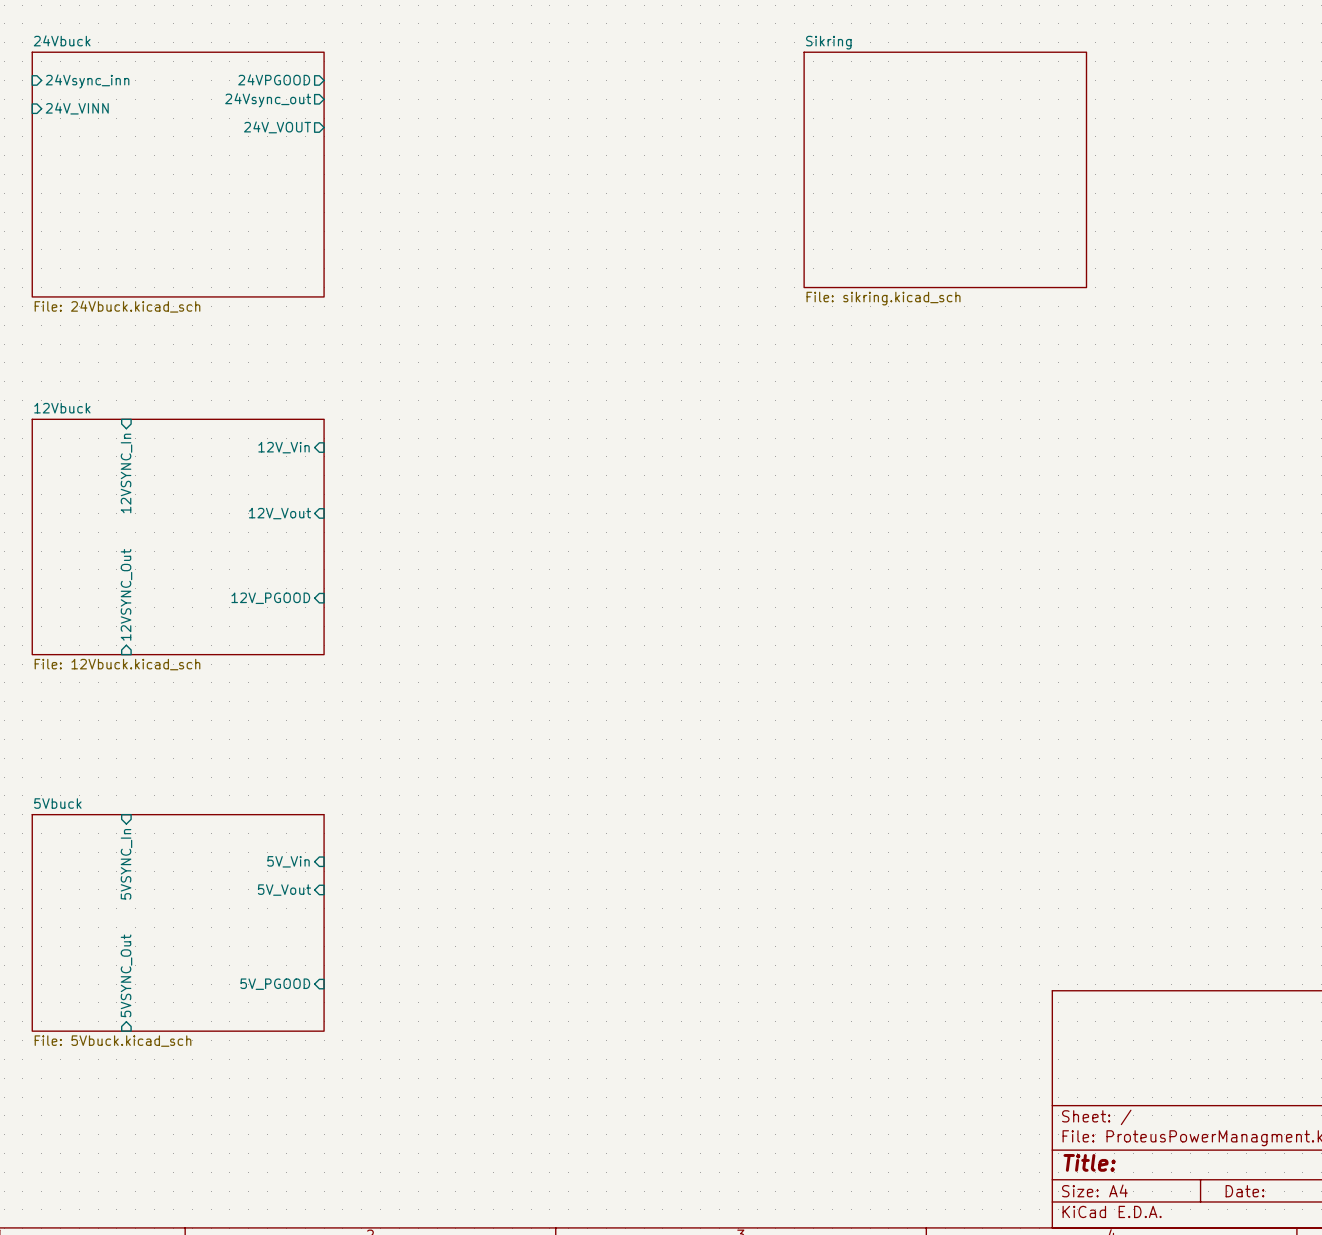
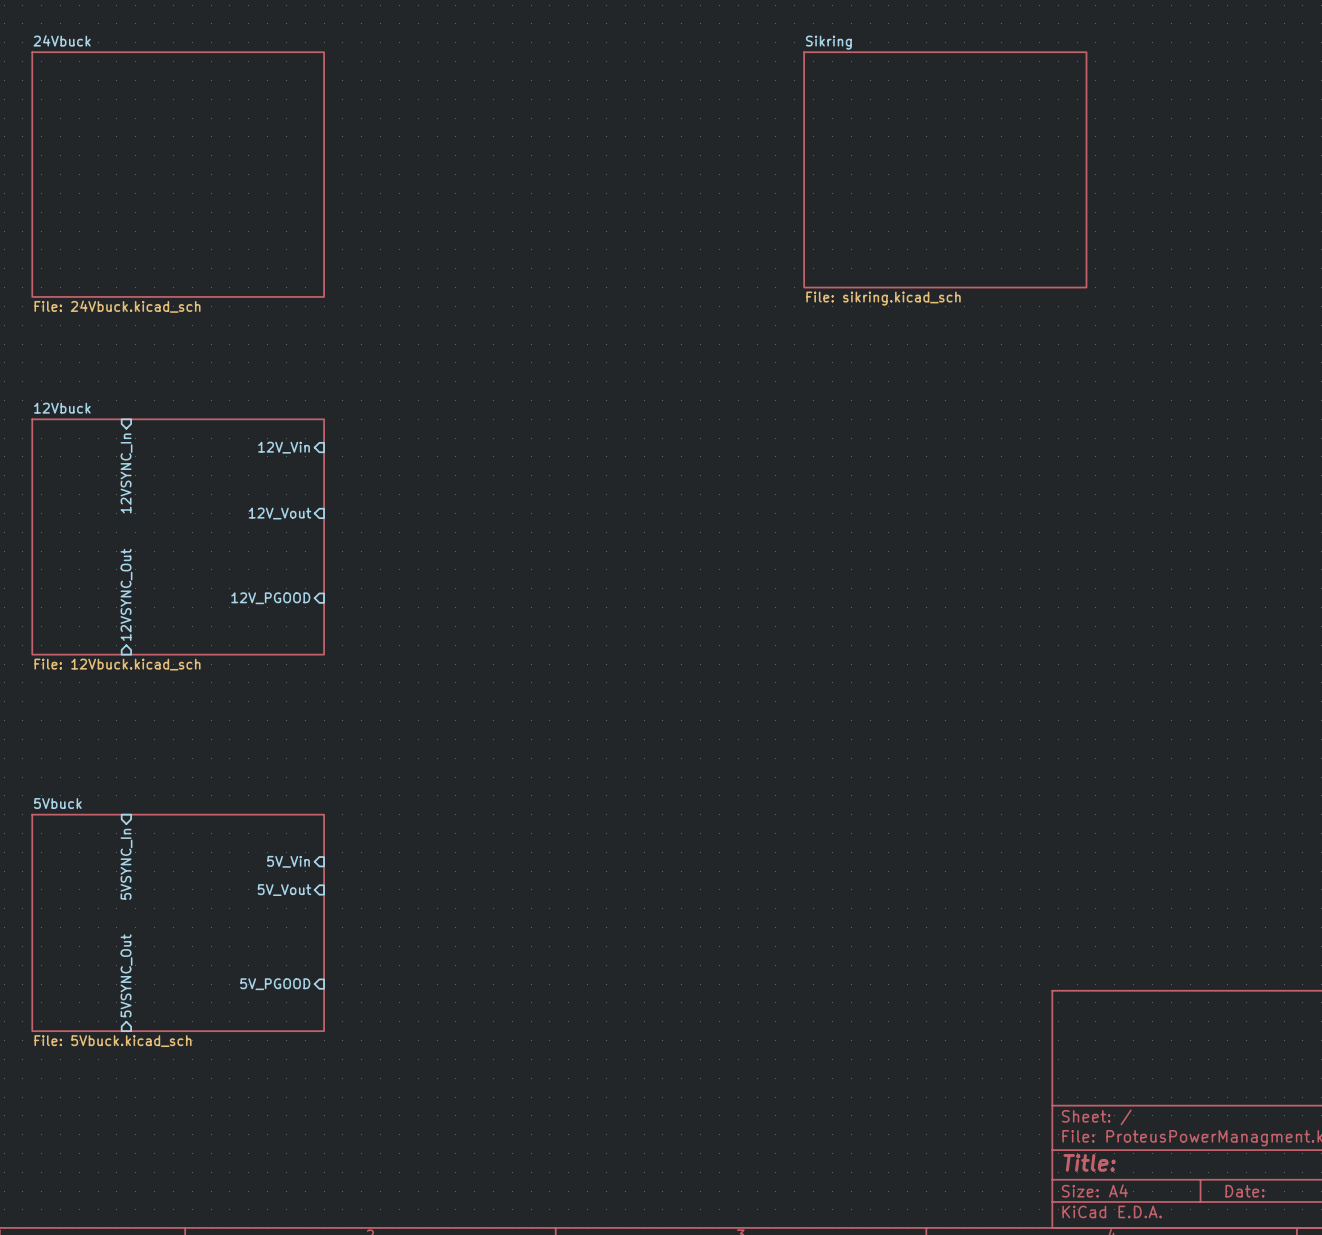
sheet pin: 24VPGOOD (274, 79) -> none
sheet pin: 24Vsync_inn (87, 81) -> none
sheet pin: 24Vsync_out (268, 100) -> none
sheet pin: 24V_VINN (77, 108) -> none
sheet pin: 24V_VOUT (277, 127) -> none

